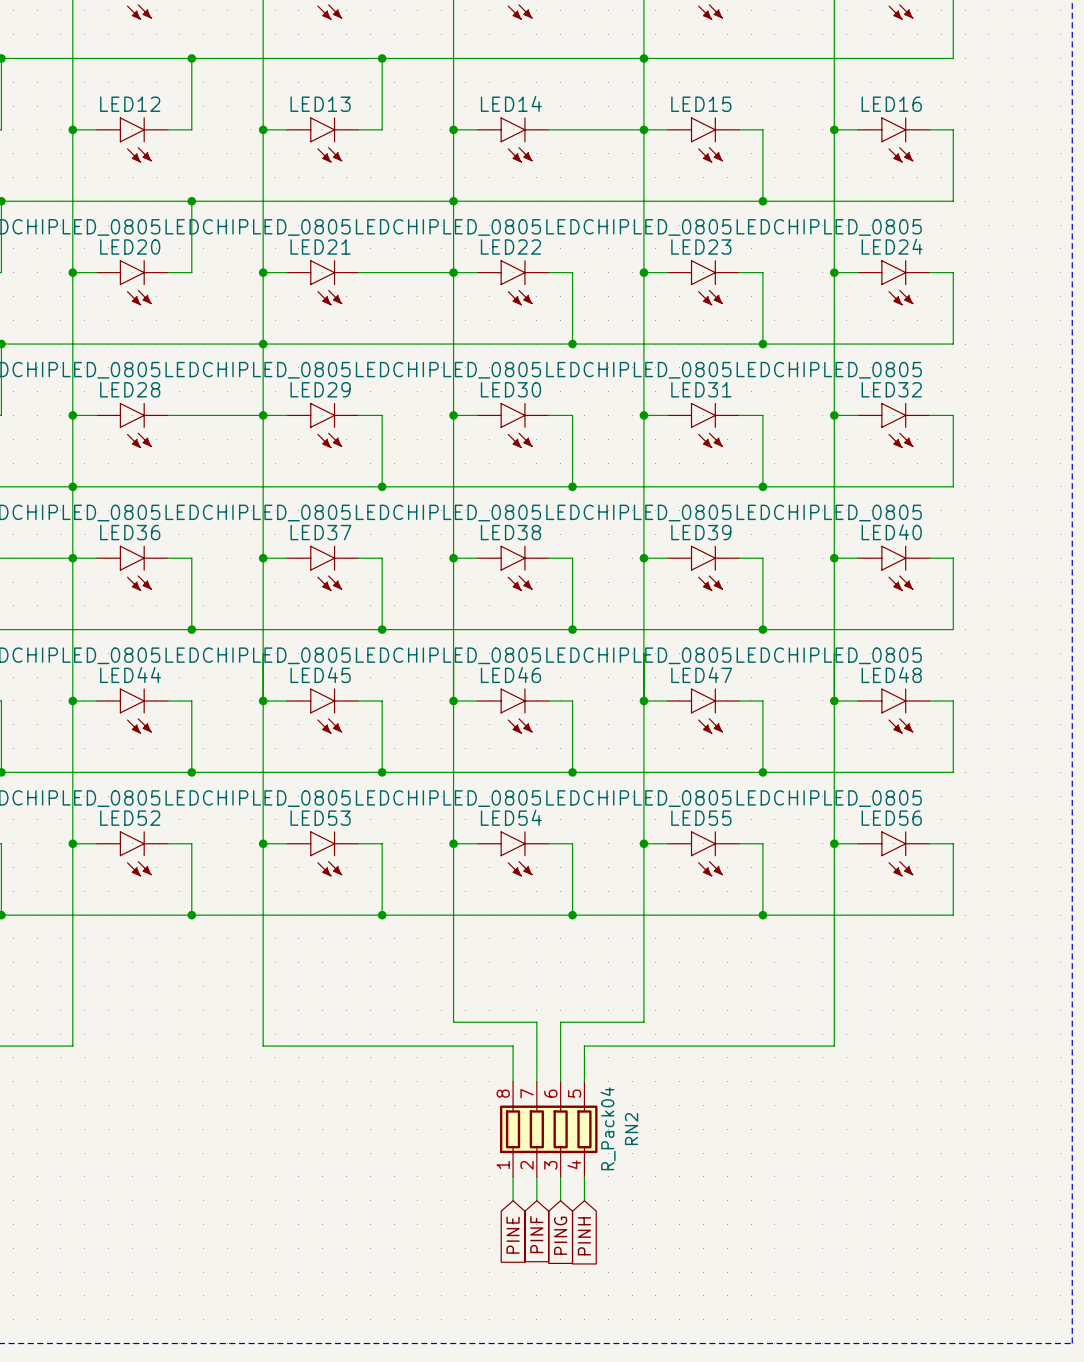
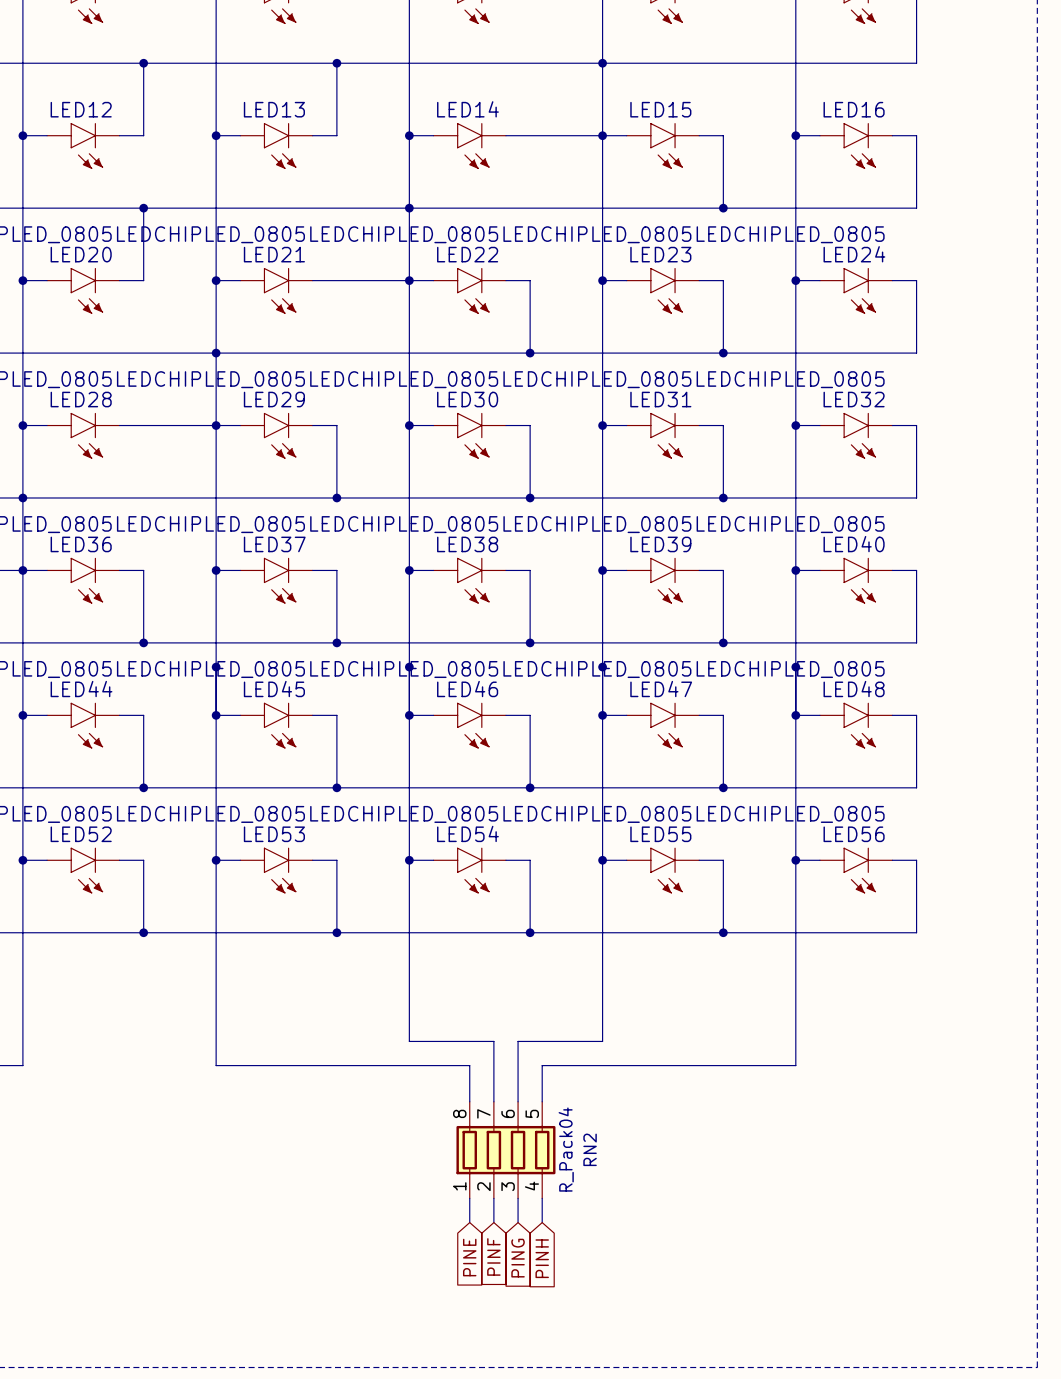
junction: none -> (216, 667)
junction: none -> (409, 667)
junction: none -> (602, 667)
junction: none -> (795, 667)

